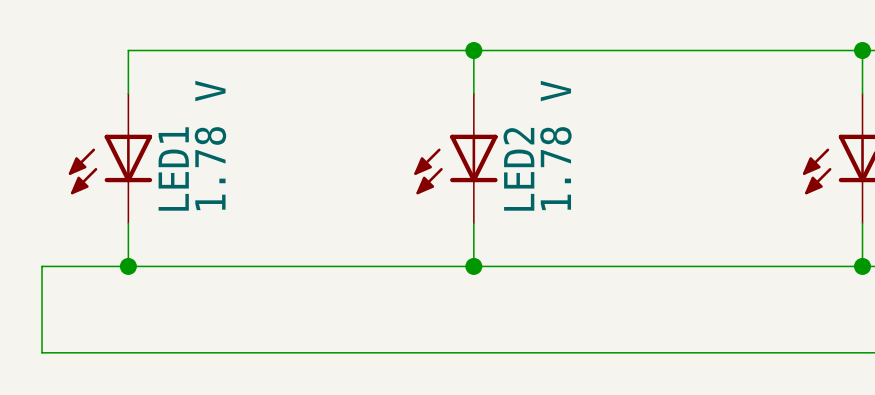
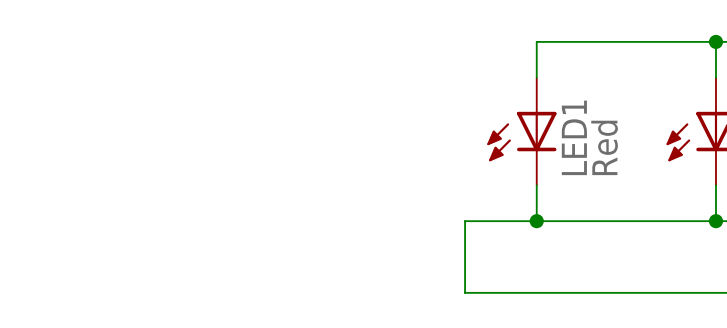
wire: (473, 50) (473, 93) -> none
junction: (473, 50) -> none
wire: (646, 50) (128, 50) (128, 93) -> (536, 41) (536, 77)
LED1 value: 1.78 V (210, 145) -> Red (604, 147)
LED1 position: (110, 158) -> (521, 131)
LED2: 1.78 V (455, 158) -> none
wire: (128, 223) (128, 266) -> none
wire: (473, 223) (473, 266) -> (536, 185) (536, 221)
junction: (128, 266) -> none
junction: (473, 266) -> none
wire: (560, 266) (42, 266) (42, 352) (560, 352) -> (465, 221) (465, 292)
junction: none -> (536, 221)

